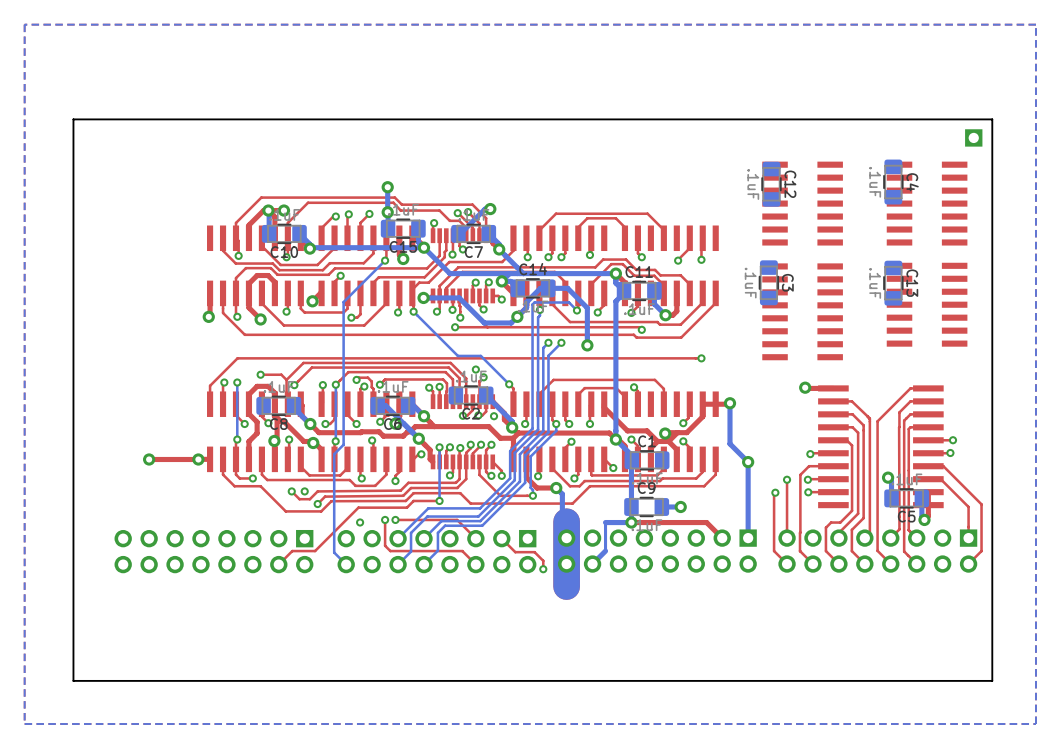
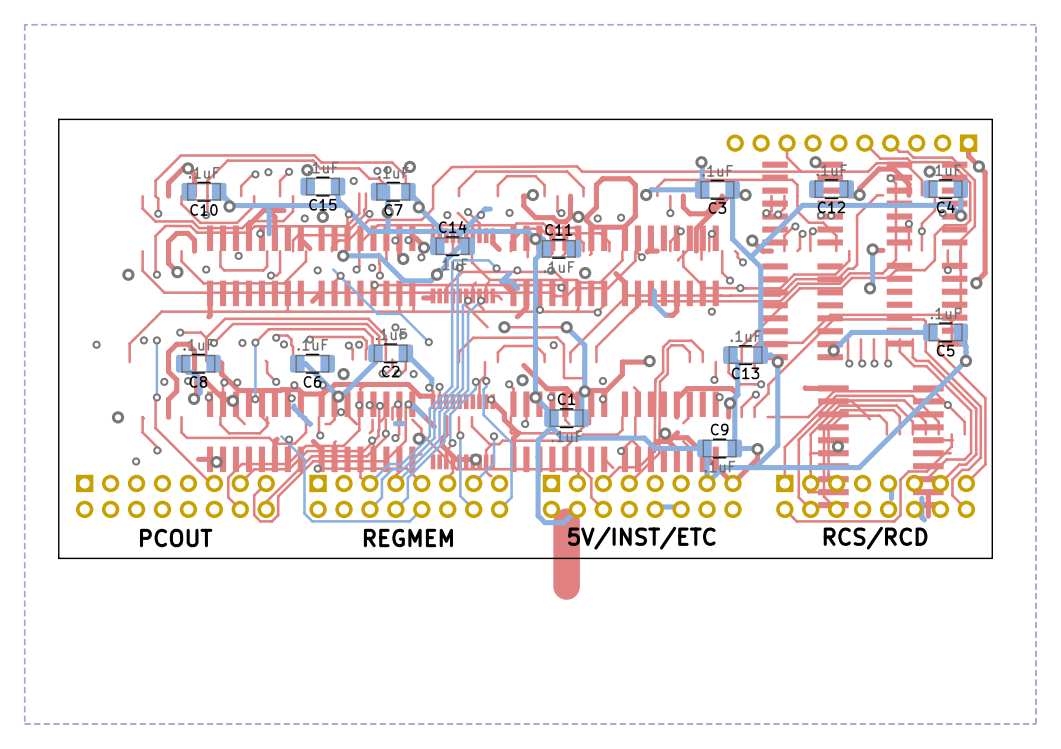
board edge: (73, 119) (73, 680) (992, 680) (992, 558) -> (73, 119) (58, 119) (58, 558) (992, 558)
part: (973, 137) -> none
top track: none -> (787, 143) (787, 157) (801, 171)
part: none -> (851, 143)
top track: none -> (864, 143) (880, 158) (907, 158) (911, 162) (950, 162) (970, 182) (970, 220) (965, 225) (944, 225) (934, 235) (934, 260) (924, 270) (895, 270) (888, 277) (851, 277) (841, 288) (799, 288) (741, 346) (741, 361)
top track: none -> (890, 143) (899, 151) (907, 151) (913, 157) (951, 157) (974, 180) (974, 226) (960, 240) (960, 312) (951, 321)
top track: none -> (968, 143) (968, 156) (985, 172) (985, 273) (976, 283)
bottom track: none -> (701, 162) (702, 189) (651, 189) (646, 194)
via: none -> (701, 162)
via: none -> (815, 162)
via: none -> (409, 166)
via: none -> (978, 166)
via: none -> (188, 168)
via: none -> (387, 169)
via: none -> (307, 170)
via: none -> (289, 171)
via: none -> (377, 171)
via: none -> (929, 171)
via: none -> (268, 172)
via: none -> (255, 174)
top track: none -> (629, 178) (602, 178) (596, 185) (596, 207) (586, 216) (586, 220) (593, 227) (624, 227) (635, 216) (635, 185) (629, 178)
top track: none -> (890, 178) (895, 183) (895, 260) (882, 273) (849, 273) (839, 283) (798, 283) (780, 301) (641, 301) (596, 346) (596, 362)
via: none -> (890, 178)
via: none -> (353, 180)
C4 rotation: 0° (893, 182) -> 90° clockwise (945, 189)
C4 position: (893, 182) -> (945, 189)
C12 rotation: 0° (771, 184) -> 90° clockwise (831, 189)
C12 position: (771, 184) -> (831, 189)
bottom track: none -> (338, 186) (338, 200) (369, 231) (527, 231) (535, 239)
via: (387, 187) -> none
bottom track: none -> (960, 189) (960, 215) (949, 204) (802, 205) (750, 257)
top track: none -> (532, 194) (523, 196) (523, 205) (535, 217) (553, 217) (557, 221) (565, 221) (570, 216) (570, 196)
via: none -> (532, 194)
via: none -> (646, 194)
bottom track: none -> (745, 194) (737, 194) (732, 189) (732, 239) (760, 267) (760, 355) (770, 355) (777, 362) (777, 445) (755, 467)
via: none -> (745, 194)
via: none -> (859, 194)
top track: none -> (657, 195) (657, 187) (664, 179) (792, 179) (797, 185) (797, 211) (808, 222) (823, 222) (836, 235) (836, 251)
top track: none -> (670, 195) (670, 213)
top track: none -> (722, 195) (705, 213) (690, 213) (683, 207) (683, 195)
top track: none -> (729, 195) (696, 228) (696, 251)
top track: none -> (771, 195) (771, 211) (766, 213)
top track: none -> (784, 195) (784, 208) (778, 214)
top track: none -> (882, 195) (877, 195) (857, 215) (857, 264) (853, 268) (848, 268) (837, 279) (796, 279) (779, 295) (627, 295) (570, 352) (570, 362)
top track: none -> (908, 195) (908, 184) (893, 169) (879, 169) (859, 188) (858, 195) (849, 195)
top track: none -> (921, 195) (921, 180) (905, 163) (876, 163) (868, 171) (582, 171) (577, 166) (452, 167) (433, 185) (433, 208) (421, 219) (368, 219) (348, 240) (338, 240) (331, 247) (331, 251)
top track: none -> (934, 195) (934, 210) (921, 223) (921, 250)
top track: none -> (194, 196) (194, 174) (188, 168) (183, 168) (168, 183) (168, 196)
top track: none -> (557, 196) (557, 211) (561, 213)
via: none -> (229, 206)
via: none -> (418, 207)
via: (490, 209) -> none
via: (268, 210) -> none
via: (283, 210) -> none
via: none -> (509, 212)
via: none -> (158, 213)
top track: (369, 213) (360, 222) (360, 238) -> (289, 171) (280, 180) (280, 196)
via: (457, 213) -> none
via: none -> (561, 213)
via: none -> (670, 213)
via: none -> (766, 213)
via: none -> (942, 213)
via: none -> (778, 214)
via: none -> (206, 215)
via: none -> (447, 215)
via: none -> (481, 215)
via: none -> (820, 215)
via: none -> (831, 215)
via: none -> (960, 215)
via: none -> (322, 216)
top track: (335, 216) (333, 216) (321, 228) (321, 238) -> (255, 174) (252, 174) (241, 186) (241, 196)
via: (335, 216) -> none
via: none -> (578, 216)
via: none -> (621, 217)
via: none -> (304, 218)
via: none -> (597, 218)
via: (434, 223) -> none
top track: none -> (908, 223) (908, 250)
via: none -> (908, 223)
top track: none -> (795, 226) (784, 235) (784, 251)
via: none -> (795, 226)
C15 position: (403, 228) -> (322, 186)
bottom track: (418, 228) (418, 242) (449, 273) (615, 273) (615, 283) (624, 290) (615, 301) (615, 439) (631, 455) (631, 522) -> none
top track: none -> (680, 231) (670, 241) (670, 251)
via: none -> (680, 231)
top track: none -> (812, 231) (810, 233) (810, 251)
via: none -> (812, 231)
via: none -> (921, 231)
via: none -> (260, 233)
C10 position: (284, 233) -> (203, 191)
bottom track: (299, 233) (309, 244) (309, 248) (424, 247) -> (219, 191) (229, 202) (229, 206) (343, 205)
C7 position: (473, 233) -> (393, 191)
bottom track: (488, 233) (499, 244) (499, 249) (523, 273) -> (408, 191) (418, 202) (418, 207) (442, 231)
top track: none -> (711, 233) (709, 236) (709, 251)
via: none -> (711, 233)
top track: none -> (802, 233) (800, 236) (800, 248) (797, 251)
via: none -> (802, 233)
top track: (439, 235) (439, 255) (427, 268) (335, 268) (328, 274) (277, 274) (270, 268) (245, 268) (236, 278) (237, 316) -> (359, 193) (359, 213) (346, 226) (254, 226) (248, 232) (197, 232) (190, 226) (165, 226) (155, 235) (156, 274)
top track: (446, 235) (444, 257) (424, 277) (378, 277) (373, 282) (373, 293) -> (365, 193) (364, 215) (344, 235) (298, 235) (293, 240) (293, 251)
top track: (466, 235) (466, 227) (459, 220) (449, 220) (439, 210) (400, 210) (393, 202) (308, 202) (287, 222) (286, 257) -> (385, 193) (385, 185) (379, 178) (369, 178) (359, 168) (320, 168) (313, 160) (227, 160) (207, 180) (206, 215)
top track: (486, 235) (486, 218) (472, 204) (401, 204) (394, 197) (261, 197) (236, 222) (238, 255) -> (405, 193) (405, 176) (392, 162) (321, 162) (314, 155) (180, 155) (155, 180) (158, 213)
top track: (334, 238) (334, 247) (317, 265) (280, 265) (261, 246) (261, 238) -> (254, 196) (254, 205) (237, 222) (200, 222) (181, 204) (181, 196)
top track: (373, 238) (373, 253) (363, 263) (329, 263) (322, 270) (279, 270) (272, 263) (235, 263) (223, 250) (223, 238) -> (293, 196) (293, 211) (283, 221) (249, 221) (242, 228) (199, 228) (192, 221) (155, 221) (142, 208) (142, 196)
top track: (513, 238) (513, 250) (502, 262) (449, 262) (428, 282) (419, 282) (412, 289) (412, 293) -> none
top track: (624, 238) (624, 227) (615, 218) (587, 218) (578, 227) (578, 238) -> (544, 196) (544, 185) (535, 176) (506, 176) (497, 185) (497, 196)
top track: (663, 238) (663, 230) (647, 213) (556, 213) (539, 230) (539, 238) -> (583, 196) (583, 187) (567, 171) (475, 171) (459, 188) (459, 196)
bottom track: none -> (535, 239) (543, 239) (543, 251) (535, 259) (535, 397) (551, 413) (551, 427)
via: none -> (535, 239)
via: none -> (395, 240)
via: none -> (408, 240)
top track: none -> (752, 240) (762, 251) (771, 251)
via: none -> (752, 240)
bottom track: none -> (467, 246) (460, 246) (446, 259) (446, 265) (430, 280) (403, 280) (378, 255) (343, 255)
via: (309, 248) -> none
via: (462, 249) -> none
via: (499, 249) -> none
bottom track: none -> (872, 249) (872, 285) (870, 288)
top track: none -> (872, 249) (882, 250)
via: none -> (872, 249)
top track: none -> (947, 250) (947, 270)
top track: none -> (194, 251) (194, 240) (187, 233) (176, 233) (168, 241) (168, 263) (177, 272)
top track: none -> (583, 251) (583, 243) (574, 233) (545, 233) (540, 228) (524, 228) (510, 242) (510, 251)
top track: none -> (609, 251) (609, 242) (600, 233) (580, 233) (574, 227) (547, 227) (543, 223) (377, 225) (359, 243) (359, 266) (356, 269)
top track: none -> (635, 251) (635, 260) (608, 288) (574, 288) (566, 296) (556, 296) (552, 292) (164, 292) (142, 270) (142, 251)
top track: none -> (657, 251) (647, 252)
top track: none -> (722, 251) (722, 272) (729, 280)
top track: none -> (735, 251) (742, 262)
top track: none -> (849, 251) (849, 260) (835, 274) (794, 274) (780, 288) (705, 288) (683, 266) (683, 251)
via: (452, 254) -> none
via: none -> (343, 255)
via: (589, 255) -> none
via: (286, 257) -> none
via: none -> (421, 257)
via: (527, 257) -> none
via: (548, 257) -> none
via: (561, 257) -> none
via: (701, 259) -> none
bottom track: (385, 260) (343, 302) (343, 444) (334, 454) (334, 552) (346, 564) -> none
via: (385, 260) -> none
via: (678, 260) -> none
via: none -> (742, 262)
via: none -> (372, 267)
bottom track: none -> (459, 267) (457, 275) (457, 387) (434, 410) (434, 438) (403, 469) (392, 469) (381, 479) (381, 497) (369, 509)
via: none -> (459, 267)
bottom track: none -> (496, 268) (488, 260) (454, 260) (452, 262) (452, 386) (429, 408) (429, 436) (401, 464) (389, 464) (369, 483)
via: none -> (496, 268)
via: none -> (206, 269)
via: none -> (356, 269)
via: none -> (317, 270)
via: none -> (517, 270)
via: none -> (551, 270)
via: none -> (947, 270)
via: none -> (177, 272)
via position: (615, 273) -> (585, 273)
via: none -> (128, 274)
via: none -> (156, 274)
via: none -> (271, 275)
via: none -> (379, 275)
via: none -> (729, 280)
via: (501, 281) -> none
via: (475, 282) -> none
via: (488, 282) -> none
C3 rotation: 0° (768, 282) -> 90° clockwise (717, 189)
C3 position: (768, 282) -> (717, 189)
C13 rotation: 0° (893, 283) -> 90° clockwise (745, 355)
C13 position: (893, 283) -> (745, 355)
via: none -> (976, 283)
top track: none -> (374, 285) (558, 285) (561, 287)
via: none -> (374, 285)
via: none -> (561, 287)
C14 position: (532, 288) -> (452, 246)
via: none -> (740, 288)
via: none -> (870, 288)
C11 position: (639, 290) -> (558, 248)
top track: (274, 293) (274, 282) (268, 275) (257, 275) (248, 283) (248, 307) (260, 319) -> none
top track: (347, 293) (347, 308) (343, 312) (304, 312) (300, 308) (300, 293) -> (267, 251) (267, 266) (263, 270) (224, 270) (220, 266) (220, 251)
top track: (360, 293) (360, 314) (357, 317) (351, 317) -> (280, 251) (280, 272) (276, 275) (271, 275)
top track: (386, 293) (386, 303) (364, 325) (283, 325) (261, 303) (261, 293) -> (306, 251) (306, 261) (283, 283) (203, 283) (181, 261) (181, 251)
top track: (663, 293) (663, 285) (654, 275) (634, 275) (622, 264) (611, 264) (591, 284) (591, 293) -> none
top track: (689, 293) (689, 284) (680, 275) (660, 275) (655, 269) (636, 269) (626, 259) (603, 259) (595, 267) (458, 267) (439, 285) (439, 308) (436, 311) -> none
top track: (702, 293) (702, 302) (680, 324) (659, 324) (657, 322) (570, 322) (552, 304) (552, 293) -> (622, 251) (622, 260) (600, 282) (579, 282) (577, 279) (489, 279) (471, 262) (471, 251)
top track: (715, 293) (715, 303) (681, 337) (636, 337) (633, 334) (244, 334) (223, 312) (223, 293) -> none
top track: (459, 295) (460, 317) -> (379, 253) (379, 275)
bottom track: (423, 297) (459, 297) (484, 322) (511, 322) (526, 307) (526, 302) (540, 288) (567, 288) (587, 308) (587, 345) -> none
via position: (423, 297) -> (436, 274)
via: (501, 299) -> none
bottom track: none -> (468, 300) (462, 305) (462, 388) (439, 412) (439, 439) (395, 483)
via: none -> (468, 300)
bottom track: none -> (481, 300) (468, 313) (468, 390) (444, 413) (444, 440) (407, 477) (407, 497) (395, 509)
via: none -> (481, 300)
via: (312, 301) -> none
via: (452, 309) -> none
via: (483, 309) -> none
bottom track: (539, 309) (538, 317) (538, 429) (514, 452) (514, 480) (478, 516) (427, 516) (411, 532) (411, 551) (398, 564) -> none
bottom track: (577, 310) (569, 302) (534, 302) (532, 304) (532, 428) (510, 451) (510, 478) (480, 508) (428, 508) (398, 538) -> none
via: (577, 310) -> none
via: (286, 311) -> none
bottom track: (413, 311) (457, 355) (480, 355) (509, 384) -> (333, 269) (377, 313) (400, 313) (428, 342)
via: (413, 311) -> none
via: (436, 311) -> none
top track: none -> (600, 311) (161, 311) (129, 343) (129, 362)
via: none -> (711, 311)
via: (398, 312) -> none
via: (631, 312) -> none
via: (665, 315) -> none
via: (208, 316) -> none
via: (237, 316) -> none
via position: (517, 316) -> (504, 327)
via: (351, 317) -> none
via: (460, 317) -> none
via: (260, 319) -> none
top track: none -> (951, 321) (951, 339)
top track: none -> (951, 321) (945, 314) (830, 314) (802, 342) (758, 342) (754, 346) (754, 370)
via: none -> (395, 327)
via: (455, 327) -> none
top track: (504, 327) (455, 327) -> none
bottom track: none -> (566, 327) (584, 345) (584, 391) (581, 394) (581, 418)
top track: (566, 327) (639, 327) (641, 329) -> none
via: none -> (566, 327)
via: (641, 329) -> none
via: none -> (180, 332)
bottom track: none -> (930, 332) (851, 332) (833, 350)
bottom track: none -> (960, 332) (960, 341) (965, 346) (965, 360) (859, 467) (722, 467) (707, 483) (707, 451) (704, 448) (654, 448) (644, 438) (562, 438) (551, 427)
via: none -> (403, 335)
top track: none -> (206, 337) (225, 318) (368, 318) (385, 336) (385, 359)
via: none -> (276, 337)
top track: none -> (309, 339) (312, 337) (362, 337) (366, 341) (365, 359)
via: none -> (309, 339)
top track: none -> (847, 339) (849, 363)
top track: none -> (860, 339) (862, 363)
top track: none -> (873, 339) (874, 363)
top track: none -> (886, 339) (888, 363)
top track: none -> (899, 339) (899, 351) (914, 366) (926, 366) (971, 410) (971, 453) (964, 459) (946, 459) (928, 477)
top track: none -> (912, 339) (912, 357) (916, 360) (928, 360) (976, 408) (976, 454) (965, 464) (959, 464) (940, 483)
top track: none -> (938, 339) (938, 351) (985, 398) (985, 464) (966, 483)
via: none -> (143, 340)
via: none -> (156, 340)
via: none -> (242, 342)
top track: none -> (255, 342) (268, 329) (364, 329) (372, 337) (372, 359)
via: none -> (255, 342)
via: none -> (428, 342)
bottom track: (548, 342) (543, 347) (543, 430) (519, 454) (519, 481) (480, 521) (441, 521) (424, 538) -> none
via: (548, 342) -> none
bottom track: (561, 342) (548, 355) (548, 432) (525, 455) (525, 482) (482, 525) (445, 525) (437, 532) (437, 550) (424, 564) -> none
via: (561, 342) -> none
top track: none -> (214, 343) (233, 324) (366, 324) (379, 336) (379, 359)
via: none -> (214, 343)
via: none -> (96, 344)
via: none -> (283, 344)
via: none -> (359, 344)
top track: none -> (348, 345) (352, 349) (352, 359)
via: none -> (348, 345)
via: none -> (553, 345)
via: (587, 345) -> none
via: none -> (833, 350)
bottom track: none -> (375, 353) (375, 362) (341, 396) (338, 396) (305, 363) (297, 363)
bottom track: none -> (730, 355) (737, 362) (737, 394)
top track: (701, 358) (237, 358) (210, 385) (210, 404) -> none
via: (701, 358) -> none
top track: none -> (265, 360) (267, 372) (276, 381)
via: none -> (965, 360)
via: none -> (649, 361)
top track: none -> (689, 361) (689, 352) (682, 345) (671, 345) (667, 349) (667, 373) (659, 381) (659, 453) (629, 483)
top track: none -> (702, 361) (702, 351) (691, 340) (669, 340) (663, 347) (663, 372) (655, 379) (654, 451) (638, 467) (619, 467) (603, 483)
top track: none -> (715, 361) (714, 379)
top track: none -> (728, 361) (728, 372) (740, 384) (761, 384)
top track: none -> (220, 362) (221, 374) (238, 390) (298, 389) (303, 394) (322, 394) (335, 384) (408, 384) (420, 396) (433, 396) (433, 391)
top track: none -> (484, 362) (486, 381)
top track: none -> (583, 362) (582, 378) (564, 378) (563, 344) (557, 337) (473, 337) (459, 352) (459, 362)
via: none -> (777, 362)
bottom track: none -> (183, 363) (183, 367) (187, 372) (192, 372) (200, 380) (200, 392) (194, 398)
via: none -> (849, 363)
via: none -> (862, 363)
via: none -> (874, 363)
via: none -> (888, 363)
top track: none -> (523, 365) (547, 388) (566, 388) (577, 399)
via: (475, 369) -> none
via: none -> (382, 373)
via: none -> (398, 373)
top track: (260, 374) (281, 374) (286, 379) -> (180, 332) (200, 332) (206, 337)
via: (260, 374) -> none
via: none -> (343, 374)
via: none -> (413, 374)
via: (483, 377) -> none
top track: (286, 379) (287, 404) -> (206, 337) (207, 362)
top track: (286, 379) (303, 362) (450, 362) (466, 378) (466, 401) -> none
top track: (356, 379) (358, 377) (367, 377) (371, 381) (373, 404) -> (276, 337) (278, 335) (287, 335) (291, 339) (293, 362)
via: (356, 379) -> none
via: none -> (714, 379)
via: none -> (522, 380)
via: none -> (164, 381)
via: none -> (188, 381)
via: none -> (276, 381)
bottom track: none -> (475, 381) (475, 388) (450, 414) (450, 441) (452, 443)
via: none -> (475, 381)
bottom track: none -> (486, 381) (486, 386) (483, 389) (483, 415) (511, 442) (511, 497) (499, 509)
via: none -> (486, 381)
via: none -> (602, 381)
bottom track: (237, 382) (237, 439) -> (156, 340) (156, 397)
bottom track: (335, 384) (335, 441) -> (255, 342) (255, 399)
top track: (335, 384) (348, 372) (445, 372) (452, 379) (452, 401) -> none
via: (335, 384) -> none
top track: (379, 384) (385, 379) (443, 379) (446, 383) (446, 401) -> none
via: (379, 384) -> none
via: none -> (761, 384)
top track: (294, 385) (312, 367) (448, 367) (459, 378) (459, 401) -> none
via: (364, 386) -> none
via: (634, 387) -> none
via: (805, 387) -> none
top track: (928, 388) (910, 388) (877, 421) (877, 550) (891, 564) -> none
via: none -> (584, 391)
bottom track: none -> (737, 394) (734, 397) (734, 448) (757, 449)
top track: none -> (755, 394) (741, 407) (741, 417)
via: none -> (755, 394)
C2 position: (471, 395) -> (390, 353)
bottom track: (486, 395) (512, 421) (512, 427) -> (405, 353) (431, 379) (431, 385)
via: none -> (338, 396)
top track: none -> (156, 397) (155, 428) (210, 483) (214, 483)
via: none -> (156, 397)
via: none -> (208, 397)
via: none -> (535, 397)
via: none -> (551, 397)
via: none -> (719, 397)
via: none -> (194, 398)
via: none -> (291, 398)
via: none -> (255, 399)
via: none -> (491, 399)
via: none -> (602, 399)
via: none -> (232, 400)
top track: (472, 401) (472, 410) (467, 415) (462, 415) -> (392, 359) (392, 367) (386, 373) (382, 373)
top track: (486, 401) (486, 411) (482, 415) (478, 415) -> (405, 359) (405, 369) (401, 373) (398, 373)
top track: (928, 401) (910, 401) (899, 412) (899, 529) (890, 538) -> none
bottom track: (729, 403) (729, 443) (748, 462) (748, 538) -> none
top track: (729, 403) (702, 404) (702, 416) (686, 432) (665, 433) -> (649, 361) (622, 362) (622, 374) (606, 390) (584, 391)
top track: (300, 404) (302, 416) (319, 432) (379, 431) (383, 436) (403, 436) (415, 426) (488, 426) (500, 438) (513, 438) -> none
top track: none -> (398, 404) (392, 408) (392, 419)
via: none -> (398, 404)
top track: none -> (408, 404) (405, 407) (405, 440) (385, 461) (313, 461) (278, 496) (278, 515) (271, 521) (260, 521) (254, 515) (254, 495) (266, 483)
via: none -> (408, 404)
top track: (604, 404) (604, 407) (627, 430) (647, 430) (657, 441) -> none
top track: (624, 404) (624, 396) (616, 388) (584, 388) (578, 394) (578, 404) -> (544, 362) (544, 354) (535, 346) (504, 346) (497, 352) (497, 362)
top track: (663, 404) (663, 388) (654, 379) (553, 379) (539, 394) (539, 404) -> none
C8 position: (278, 405) -> (198, 363)
top track: none -> (359, 405) (359, 430) (343, 445) (306, 445) (287, 464) (241, 464) (228, 477) (228, 497) (240, 509)
via: none -> (359, 405)
via: none -> (369, 405)
bottom track: (377, 405) (385, 405) (418, 438) -> none
top track: none -> (379, 405) (378, 436) (363, 451) (307, 451) (289, 469) (254, 469) (240, 483)
via: none -> (379, 405)
C6 position: (392, 405) -> (312, 363)
via: none -> (947, 405)
via: none -> (341, 412)
top track: (833, 414) (852, 414) (863, 425) (863, 518) (851, 529) (851, 551) (865, 564) -> none
top track: (928, 414) (910, 414) (904, 420) (904, 551) (916, 564) -> none
top track: (274, 415) (303, 441) (313, 441) (313, 443) -> (194, 373) (223, 399) (233, 399) (232, 400)
via: (462, 415) -> none
via: (478, 415) -> none
via: (424, 416) -> none
via: (494, 416) -> none
top track: (867, 416) (869, 418) (869, 534) (865, 538) -> none
via: none -> (118, 417)
top track: none -> (318, 417) (320, 435)
top track: none -> (446, 417) (446, 434) (442, 438) (442, 445) (456, 459) (475, 459)
top track: none -> (459, 417) (460, 435)
top track: none -> (622, 417) (622, 429) (617, 434) (583, 434) (577, 440) (502, 440) (499, 444) (489, 444) (471, 426) (471, 417)
top track: none -> (635, 417) (635, 436) (621, 451)
top track: none -> (728, 417) (728, 403) (737, 394) (731, 388) (687, 388) (676, 399) (676, 417)
top track: none -> (754, 417) (754, 407) (768, 393) (768, 384) (833, 319) (923, 319) (925, 321) (925, 351) (980, 406) (980, 457) (968, 469) (962, 469) (952, 479) (952, 495) (966, 509)
top track: none -> (767, 417) (808, 417) (834, 391) (934, 391) (964, 421) (964, 434)
top track: none -> (143, 418) (142, 417) (142, 432) (160, 450) (157, 450)
top track: none -> (372, 419) (372, 430) (369, 433)
top track: none -> (385, 419) (385, 437) (366, 456) (311, 456) (266, 501) (266, 509)
top track: none -> (399, 419) (399, 434) (395, 438)
top track: none -> (412, 419) (421, 428) (421, 433) (456, 469) (582, 469) (591, 478) (591, 497) (603, 509)
via: (380, 421) -> none
via: (268, 423) -> none
via: (395, 423) -> none
via: (683, 423) -> none
via: (244, 424) -> none
via: (310, 424) -> none
via: (325, 424) -> none
via: (356, 424) -> none
bottom track: (556, 424) (556, 430) (530, 456) (530, 487) (532, 490) (532, 495) -> none
via: (556, 424) -> none
via: (569, 424) -> none
via: (589, 424) -> none
via: (512, 427) -> none
bottom track: none -> (551, 427) (538, 440) (538, 515) (545, 522) (564, 522) (577, 509) (579, 511)
top track: (833, 427) (852, 427) (858, 432) (858, 513) (839, 532) (839, 538) -> none
top track: (928, 427) (910, 427) (908, 429) (908, 530) (917, 538) -> none
via: none -> (385, 433)
top track: (518, 433) (609, 433) (624, 446) (624, 459) -> none
top track: none -> (886, 434) (886, 422) (879, 415) (842, 415) (828, 429) (828, 475) (836, 483)
top track: none -> (899, 434) (899, 416) (893, 410) (841, 410) (823, 427) (823, 496) (836, 509)
top track: none -> (912, 434) (912, 421) (896, 405) (839, 405) (810, 434) (810, 483)
top track: none -> (925, 434) (925, 421) (904, 400) (838, 400) (798, 439) (798, 497) (810, 509)
top track: none -> (938, 434) (938, 421) (912, 395) (836, 395) (784, 447) (784, 483)
top track: none -> (951, 434) (951, 446) (926, 471) (908, 471) (900, 479) (900, 515) (894, 521) (796, 521) (784, 509)
via: none -> (320, 435)
bottom track: none -> (460, 435) (460, 496) (473, 509)
via: none -> (460, 435)
bottom track: none -> (281, 436) (304, 459) (304, 513) (312, 521) (409, 521) (421, 509)
bottom track: none -> (494, 436) (494, 463) (473, 483)
via: none -> (494, 436)
top track: none -> (675, 437) (687, 437) (732, 483) (757, 458) (757, 449)
via: none -> (395, 438)
top track: (418, 438) (430, 450) (430, 459) (432, 461) -> none
top track: (237, 439) (236, 474) (239, 478) (252, 478) -> none
via: (237, 439) -> none
via: (615, 439) -> none
via: (631, 439) -> none
top track: (274, 440) (277, 439) (274, 393) (268, 386) (257, 386) (248, 394) (248, 413) (257, 422) (257, 433) (248, 441) (248, 459) -> (194, 398) (196, 397) (194, 350) (187, 344) (176, 344) (168, 352) (168, 371) (176, 379) (176, 391) (168, 399) (168, 417)
via: (274, 440) -> none
top track: (833, 440) (846, 440) (852, 445) (852, 510) (840, 522) (831, 522) (825, 527) (825, 551) (839, 564) -> none
via: (953, 440) -> none
via: (335, 441) -> none
via: (571, 441) -> none
via: (683, 441) -> none
via: (313, 443) -> none
via: none -> (452, 443)
top track: (470, 444) (470, 448) (466, 452) (466, 479) (457, 488) (411, 488) (403, 495) (325, 496) (317, 504) -> none
via: (470, 444) -> none
top track: (481, 444) (472, 453) (472, 461) -> none
via: (481, 444) -> none
via: (491, 444) -> none
via: none -> (837, 446)
bottom track: (439, 447) (439, 500) -> none
via: (439, 447) -> none
via: (449, 447) -> none
top track: (460, 448) (459, 479) (455, 482) (408, 482) (400, 490) (317, 491) (309, 499) (299, 499) (291, 491) -> none
via: (460, 448) -> none
via: none -> (157, 450)
via: none -> (621, 451)
via: (950, 453) -> none
via: (421, 454) -> none
via: (810, 454) -> none
via: (149, 459) -> none
top track: (198, 459) (149, 459) -> none
via position: (198, 459) -> (216, 462)
top track: (347, 459) (347, 468) (340, 475) (309, 475) (300, 466) (300, 459) -> (267, 417) (267, 426) (259, 433) (229, 433) (220, 424) (220, 417)
top track: (386, 459) (386, 474) (375, 485) (355, 485) (349, 480) (267, 480) (261, 474) (261, 459) -> (306, 417) (306, 432) (294, 443) (275, 443) (269, 437) (186, 437) (181, 432) (181, 417)
via: none -> (475, 459)
top track: (526, 459) (526, 477) (537, 488) (556, 488) -> none
top track: (663, 459) (663, 468) (657, 475) (592, 475) (591, 459) -> (583, 417) (583, 426) (577, 433) (511, 433) (510, 417)
top track: (702, 459) (702, 471) (696, 478) (662, 478) (659, 481) (584, 481) (579, 486) (570, 486) (552, 468) (552, 459) -> none
top track: (715, 459) (715, 474) (704, 486) (589, 486) (572, 503) (470, 503) (460, 493) (413, 493) (405, 500) (331, 501) (321, 511) (285, 511) (260, 486) (234, 486) (223, 474) (223, 459) (224, 460) -> none
C1 position: (647, 460) -> (566, 418)
via: none -> (136, 461)
top track: (479, 461) (479, 474) (500, 495) (532, 495) -> none
top track: (492, 461) (501, 470) (501, 475) -> none
via position: (748, 462) -> (757, 449)
top track: (833, 466) (809, 466) (800, 474) (800, 551) -> none
top track: (928, 466) (943, 466) (981, 504) (981, 551) (968, 564) -> none
top track: none -> (317, 468) (406, 468) (421, 483)
via: none -> (317, 468)
via: (613, 468) -> none
via: (449, 475) -> none
via: (491, 475) -> none
via: (501, 475) -> none
via: (538, 476) -> none
via: (888, 477) -> none
via: (252, 478) -> none
via: (361, 478) -> none
via: (574, 478) -> none
top track: (787, 479) (787, 538) -> none
via: (787, 479) -> none
via: (807, 479) -> none
top track: (928, 479) (940, 479) (968, 506) (968, 538) -> none
via: (395, 481) -> none
bottom track: (556, 488) (562, 494) (562, 517) (566, 521) (566, 586) -> none
via: (556, 488) -> none
via: (291, 491) -> none
via: (304, 491) -> none
top track: (775, 492) (774, 551) (787, 564) -> none
via: (775, 492) -> none
via: (808, 492) -> none
via: (532, 495) -> none
part: none -> (175, 496)
part: none -> (408, 496)
part: none -> (642, 496)
part: none -> (875, 496)
C5 position: (906, 498) -> (945, 332)
top track: (439, 500) (413, 500) (406, 507) (358, 507) (315, 551) (292, 551) (278, 564) -> none
via: (439, 500) -> none
via: (317, 504) -> none
C9 position: (646, 506) -> (719, 448)
via: (680, 506) -> none
top track: (385, 519) (385, 545) (390, 551) (462, 551) (475, 564) -> none
via: (385, 519) -> none
top track: (395, 519) (457, 519) (475, 538) -> none
via: (395, 519) -> none
via: (924, 519) -> none
via: (360, 522) -> none
bottom track: (631, 522) (605, 522) (605, 551) (592, 564) -> none
top track: (631, 522) (706, 522) (722, 538) -> none
via: (631, 522) -> none
text: none -> PCOUT (176, 538)
text: none -> REGMEM (408, 538)
top track: (501, 538) (515, 552) (534, 552) (543, 560) (543, 569) -> none
text: none -> 5V/INST/ETC (641, 538)
text: none -> RCS/RCD (875, 538)
part: (213, 551) -> none
part: (436, 551) -> none
part: (657, 551) -> none
top track: (800, 551) (813, 564) -> none
part: (877, 551) -> none
via: (543, 569) -> none

